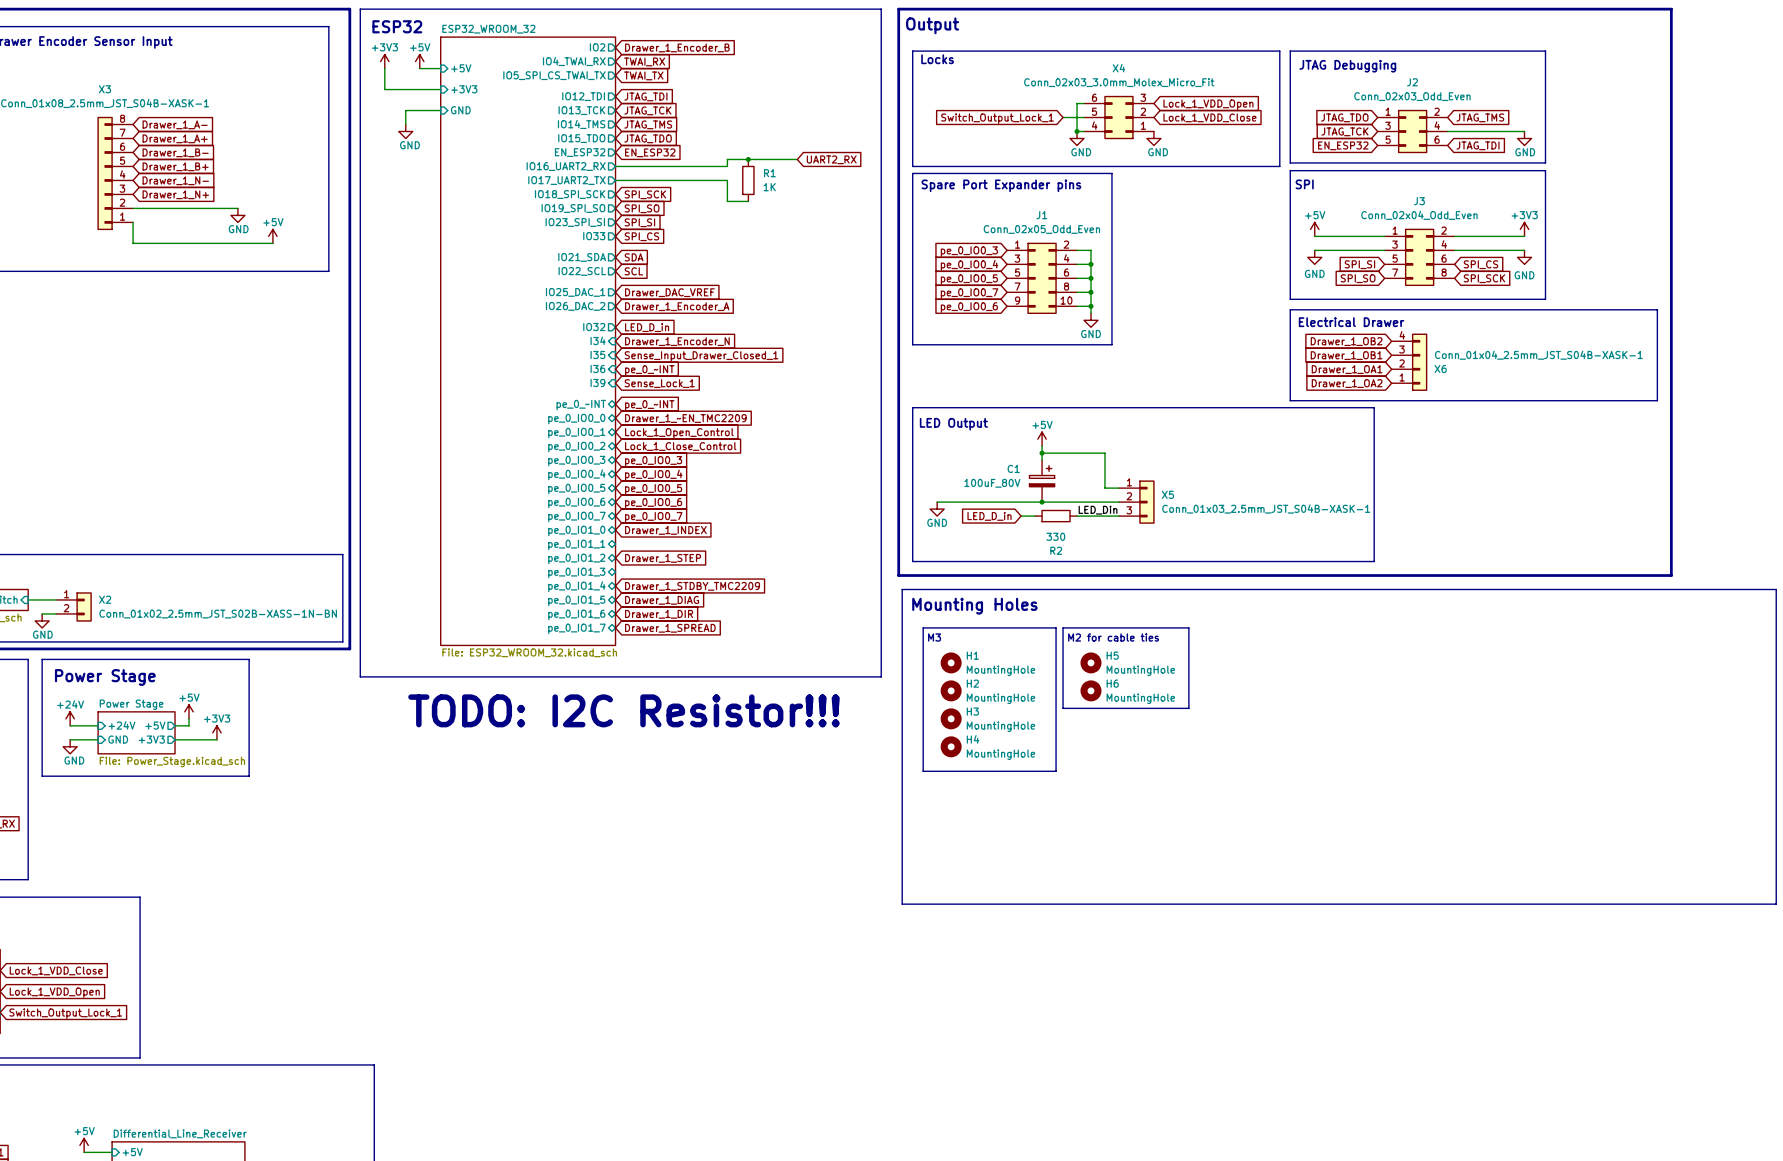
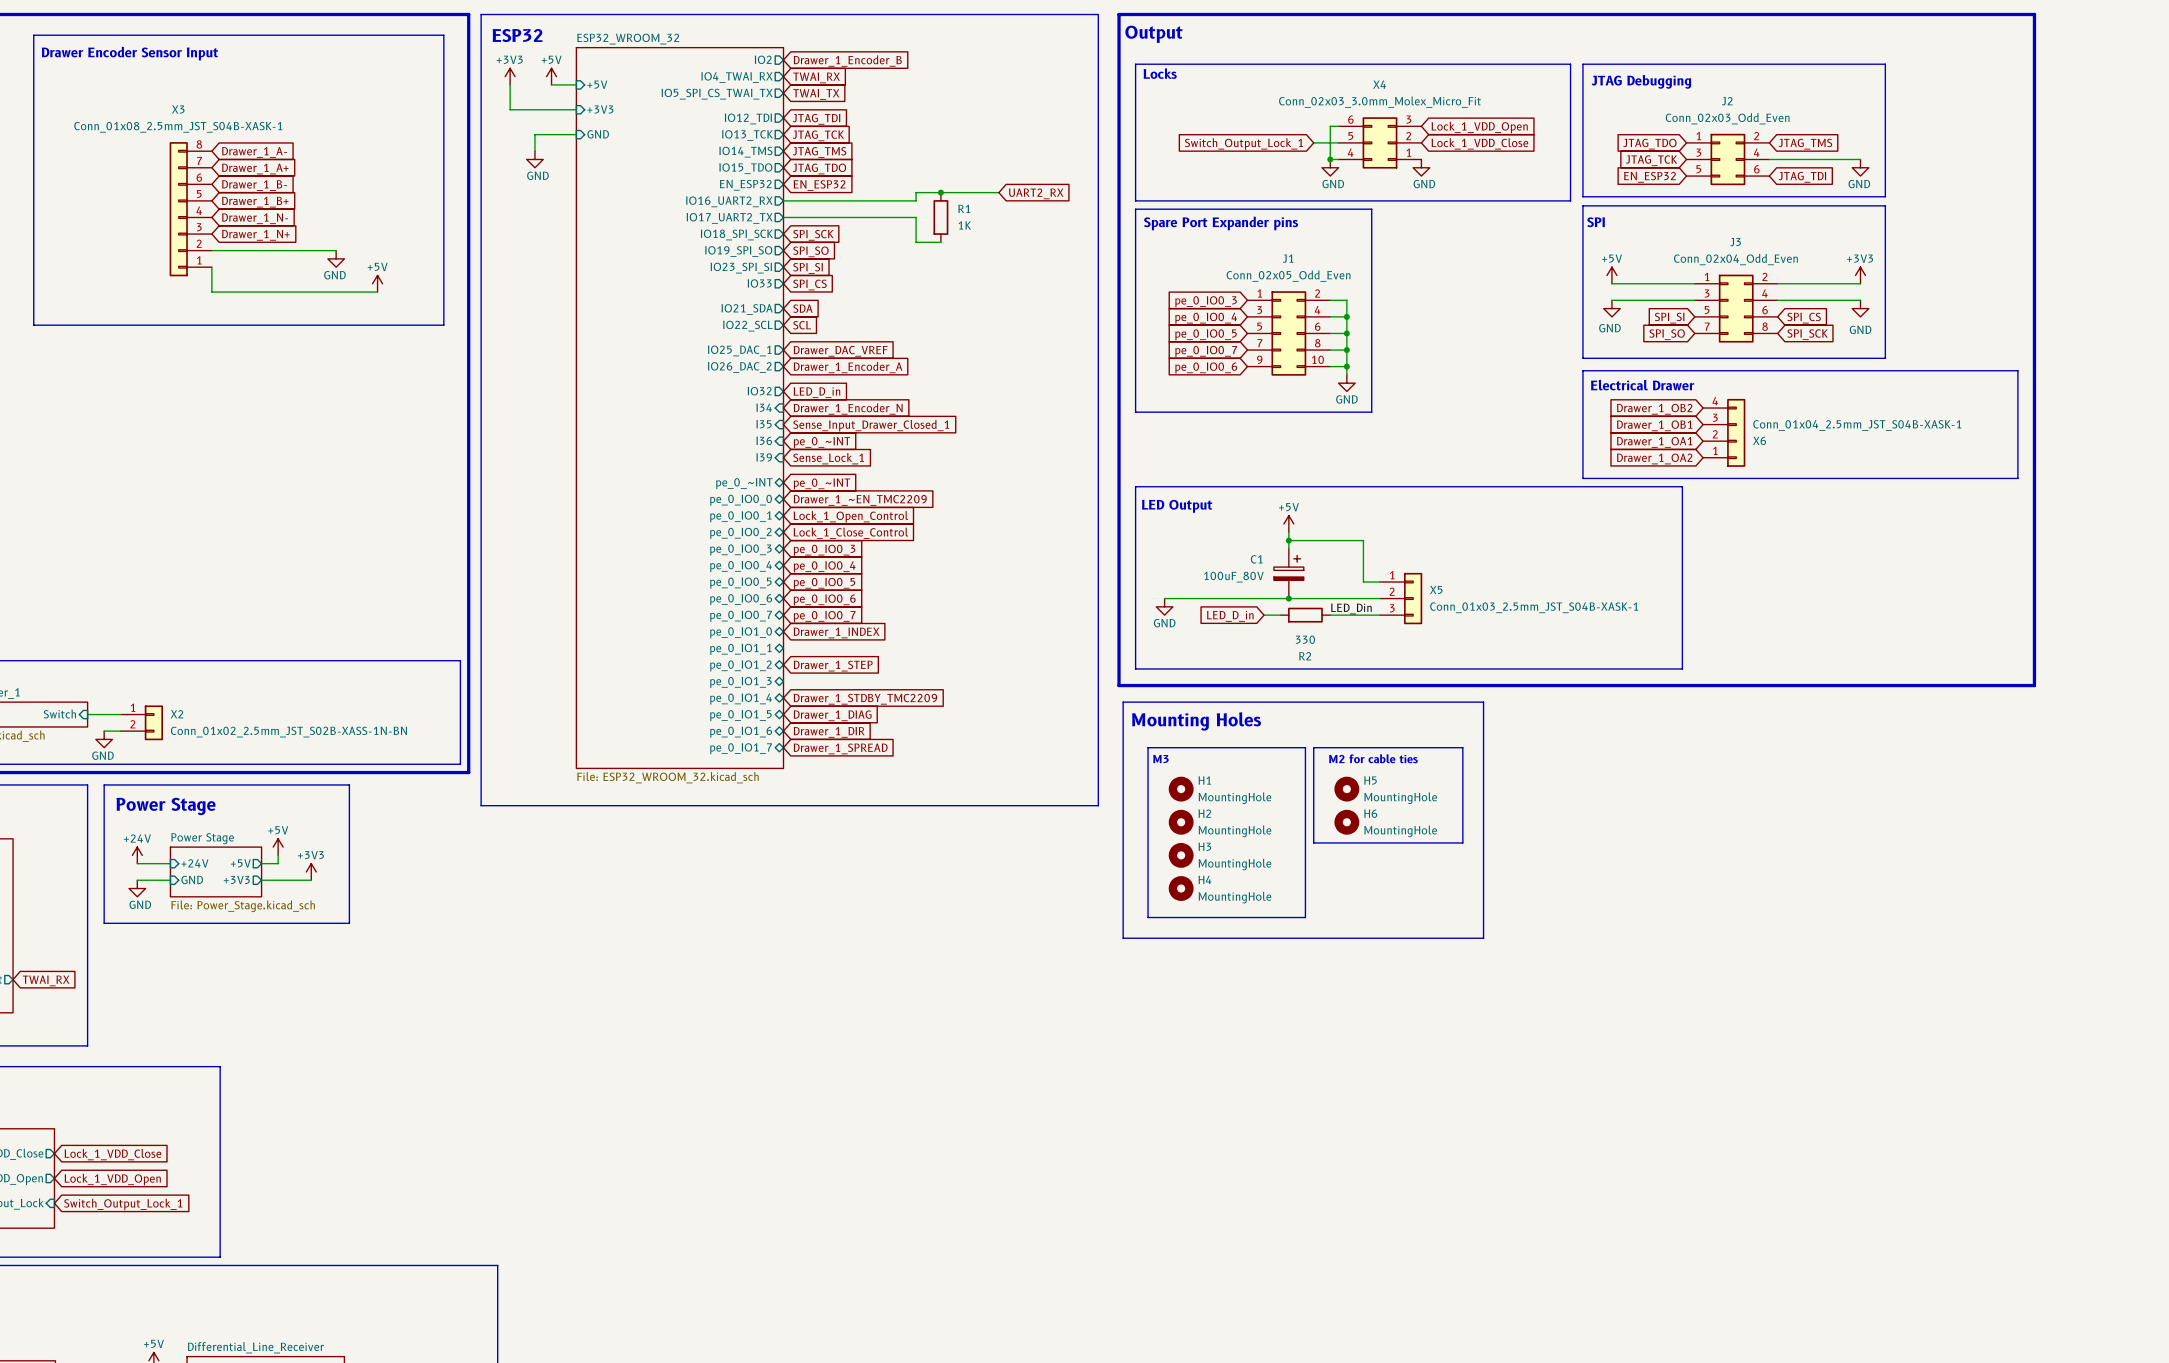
line: (1206, 589) (1776, 589) (1776, 904) (902, 904) (902, 788) -> (1483, 702) (1483, 938) (1123, 938)
text: TODO: I2C Resistor!!! (624, 710) -> none

